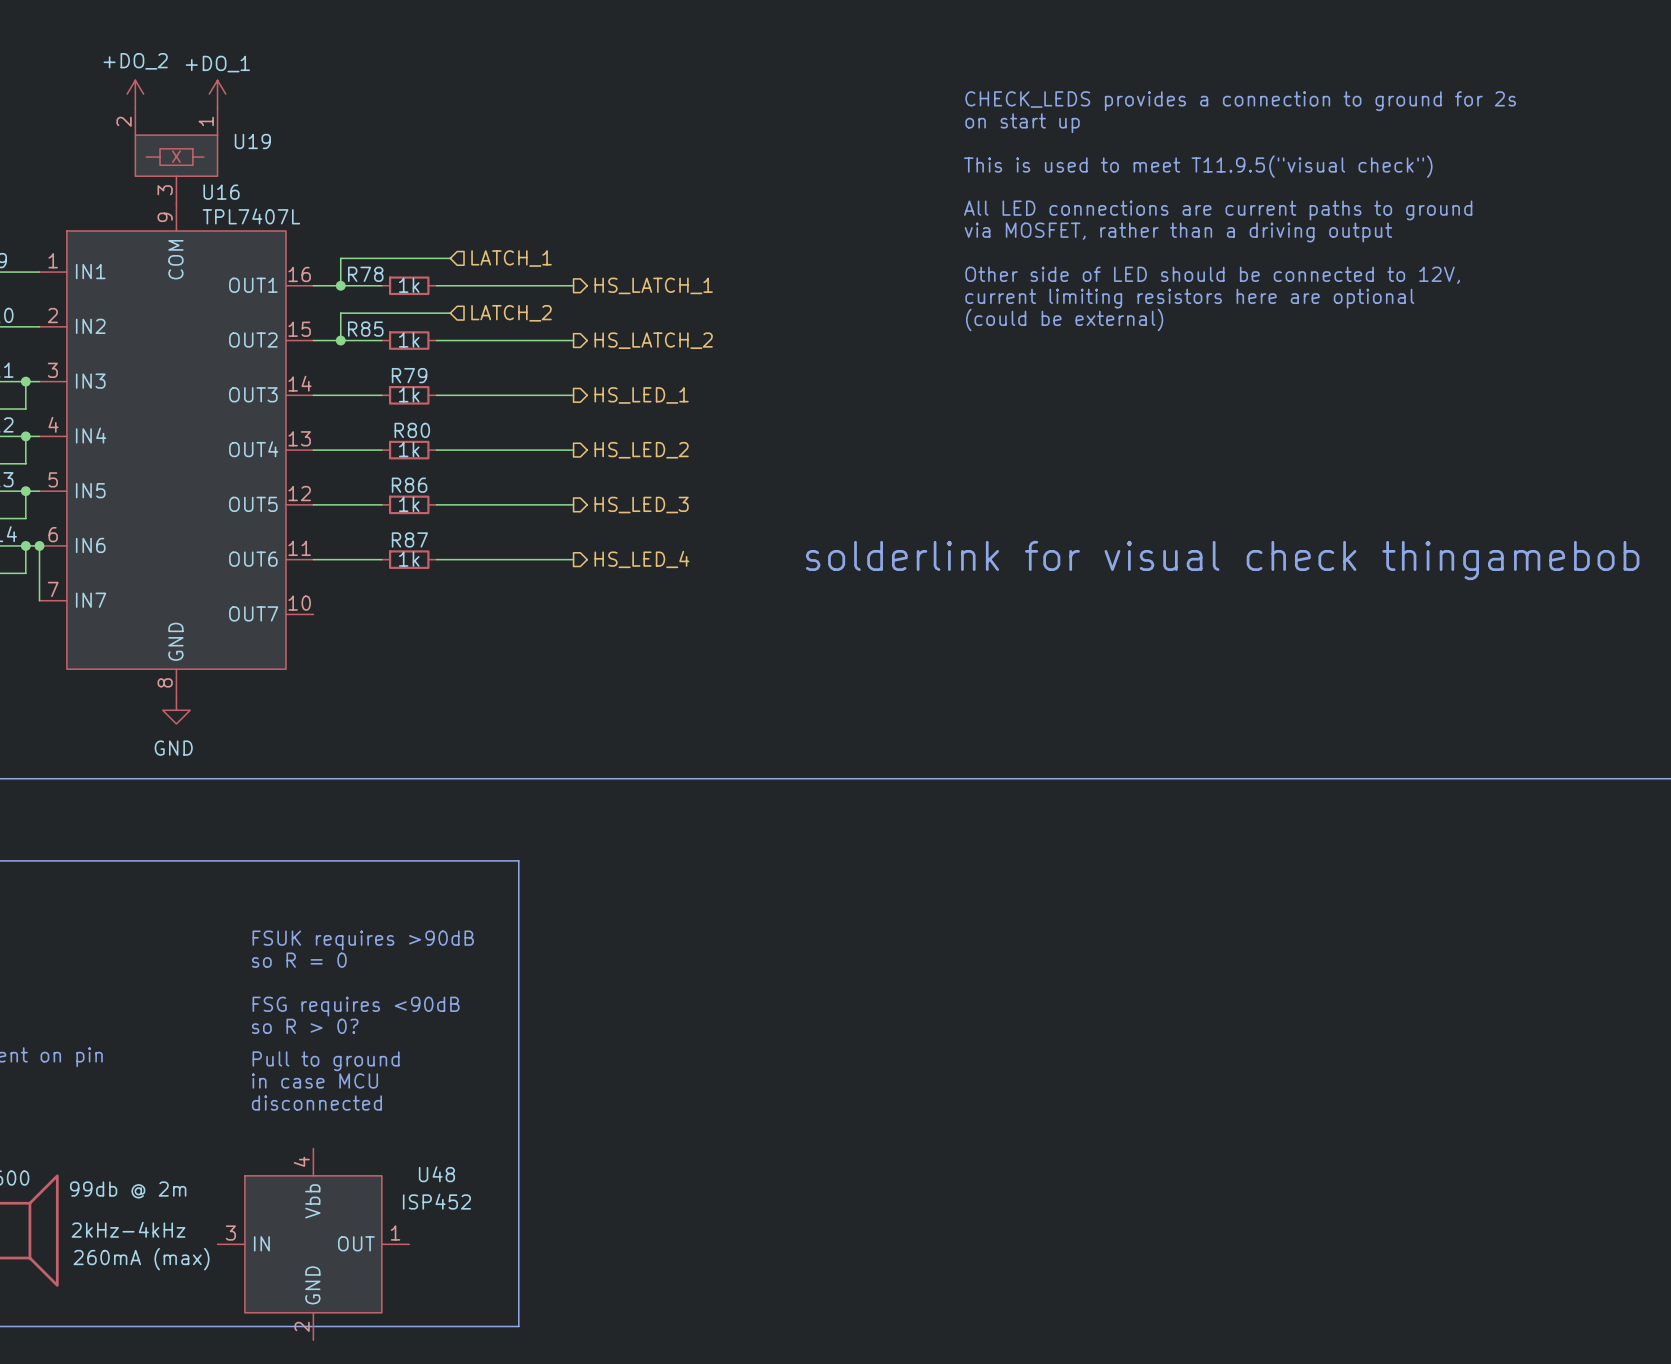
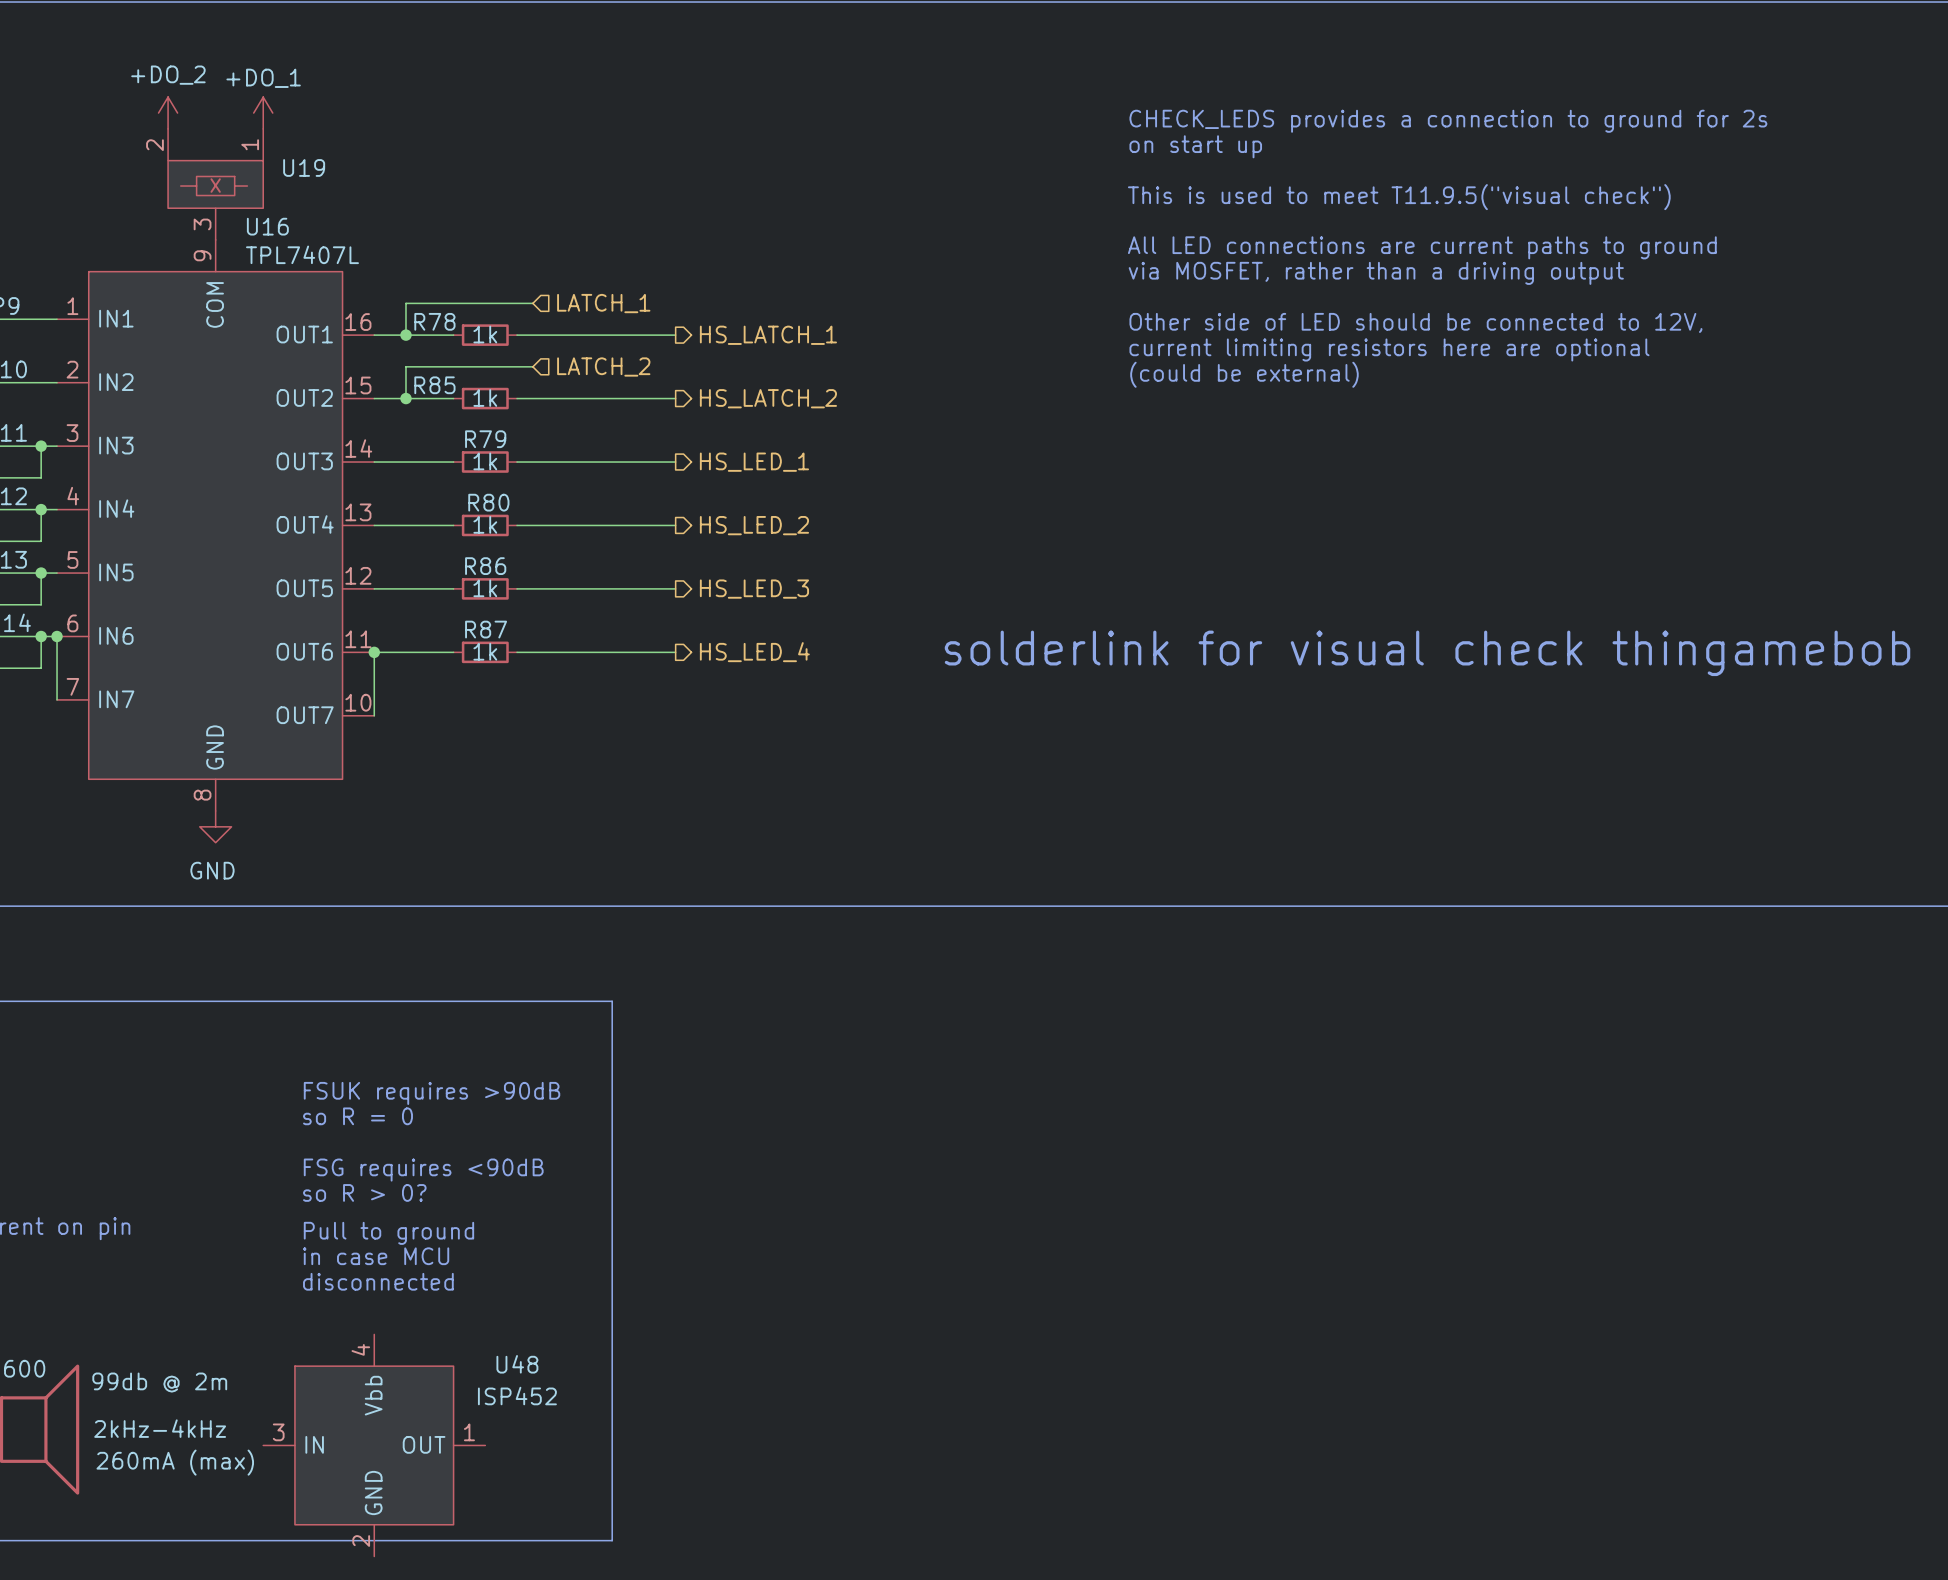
wire: none -> (374, 652) (374, 715)
junction: none -> (374, 652)

